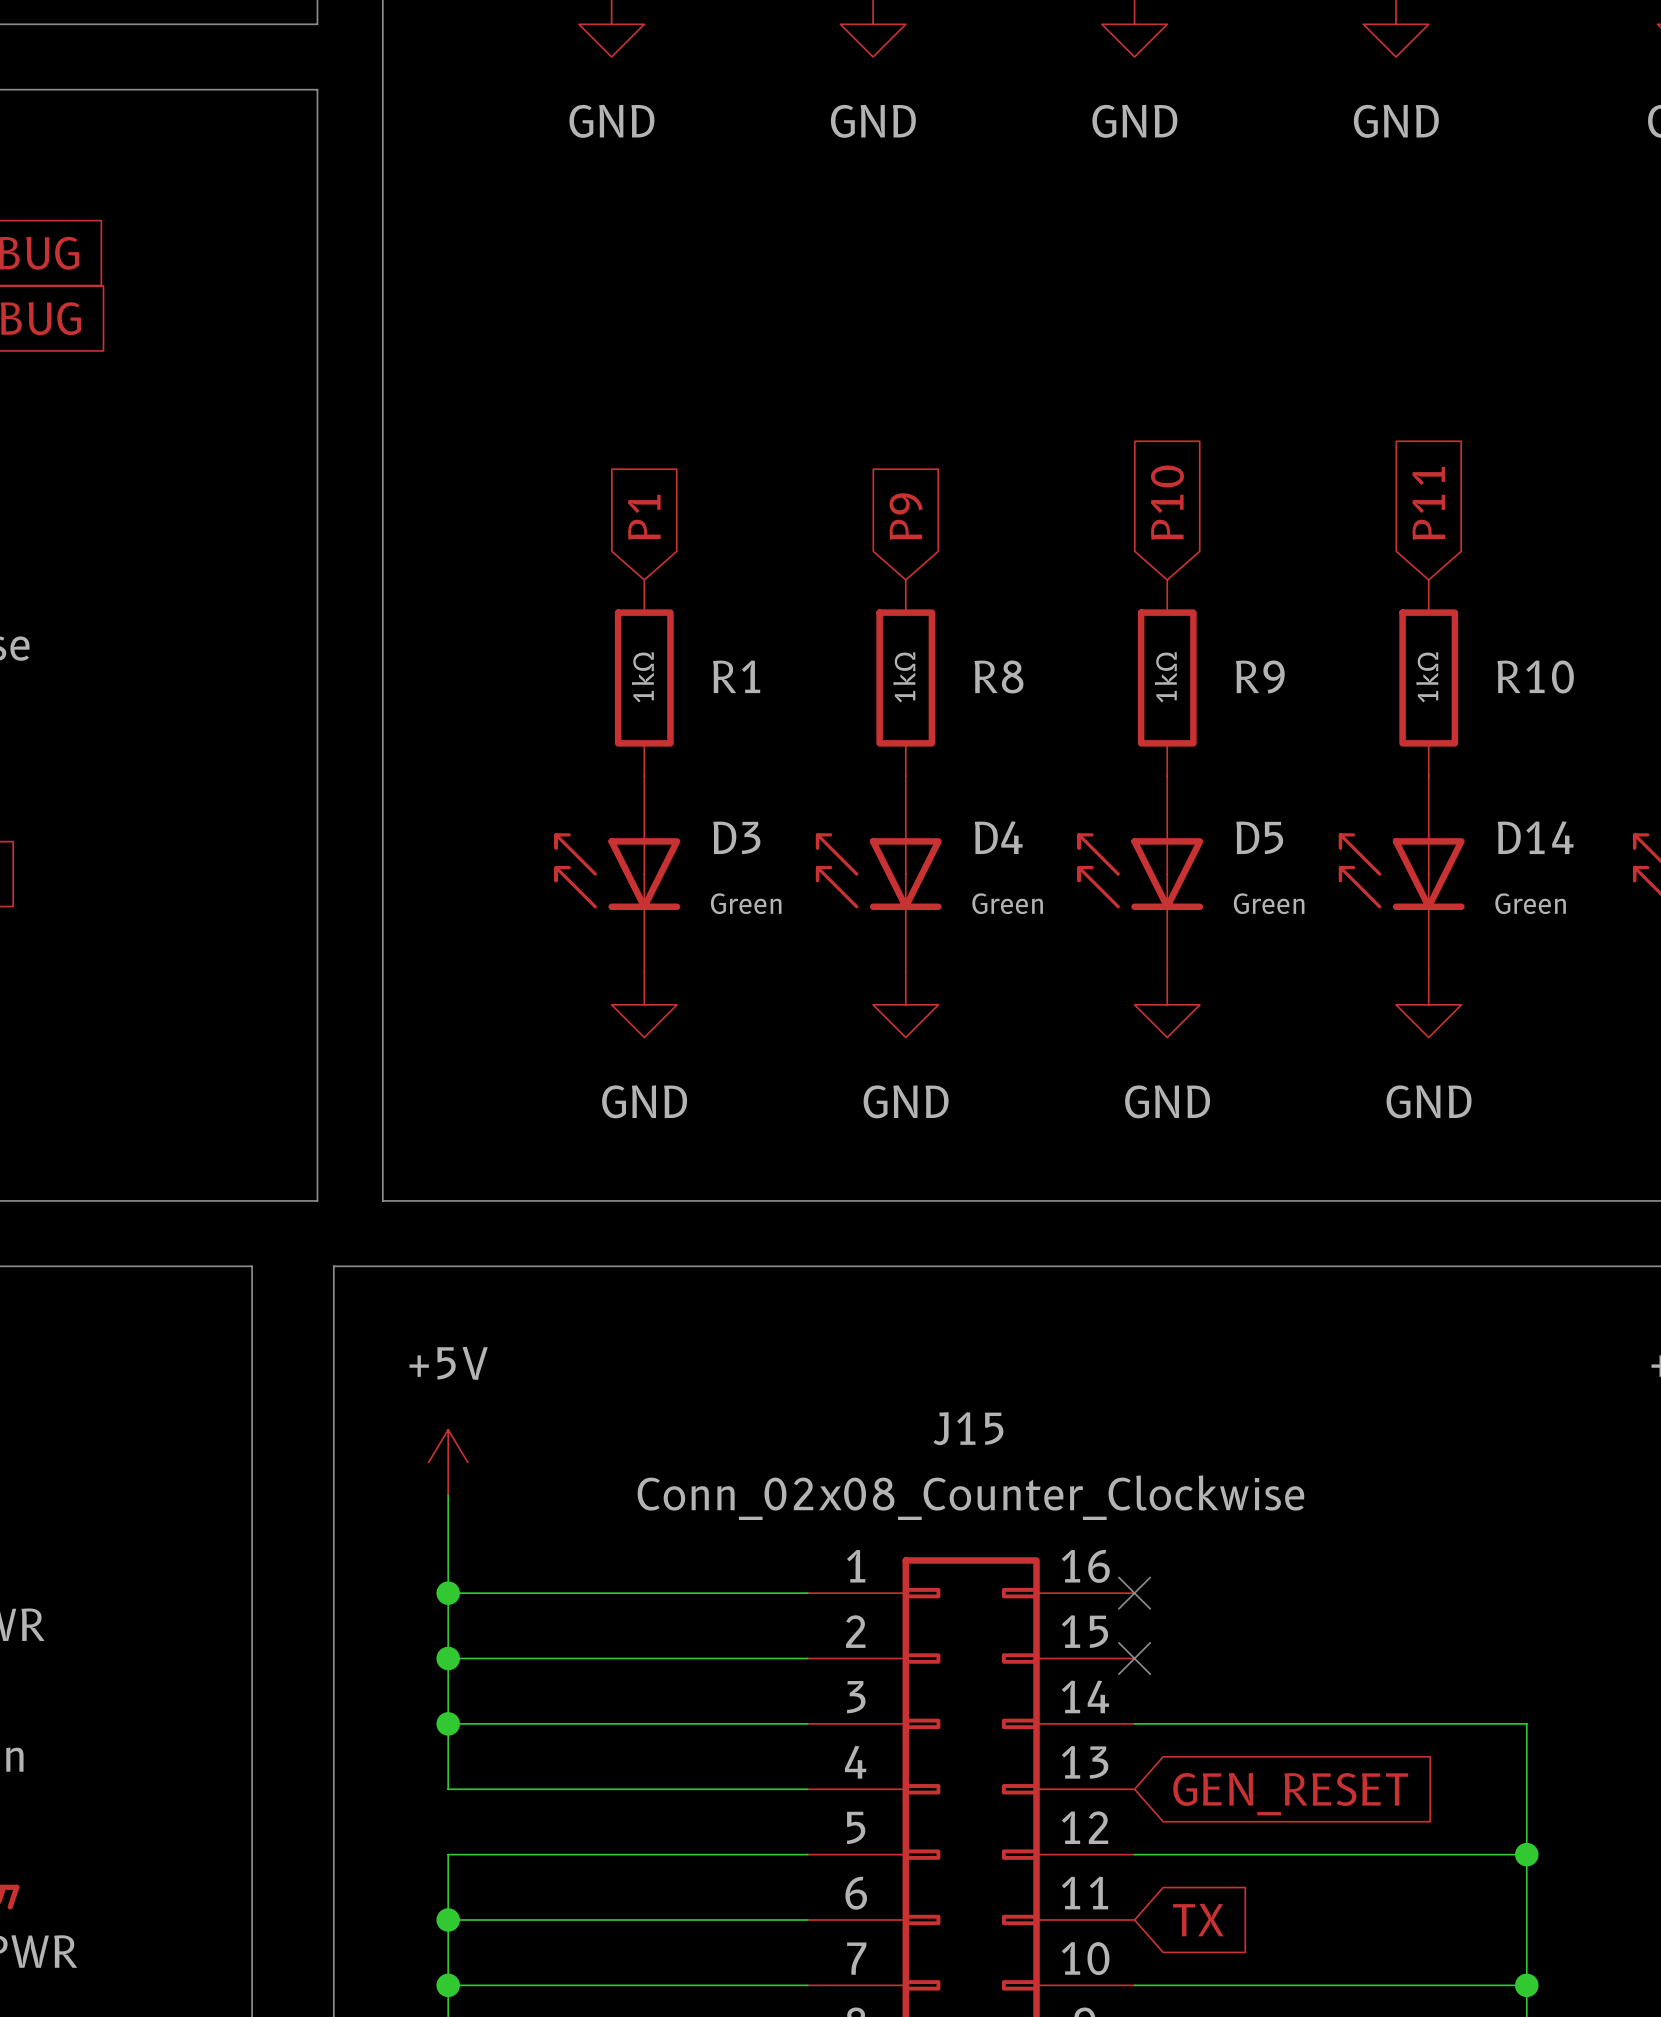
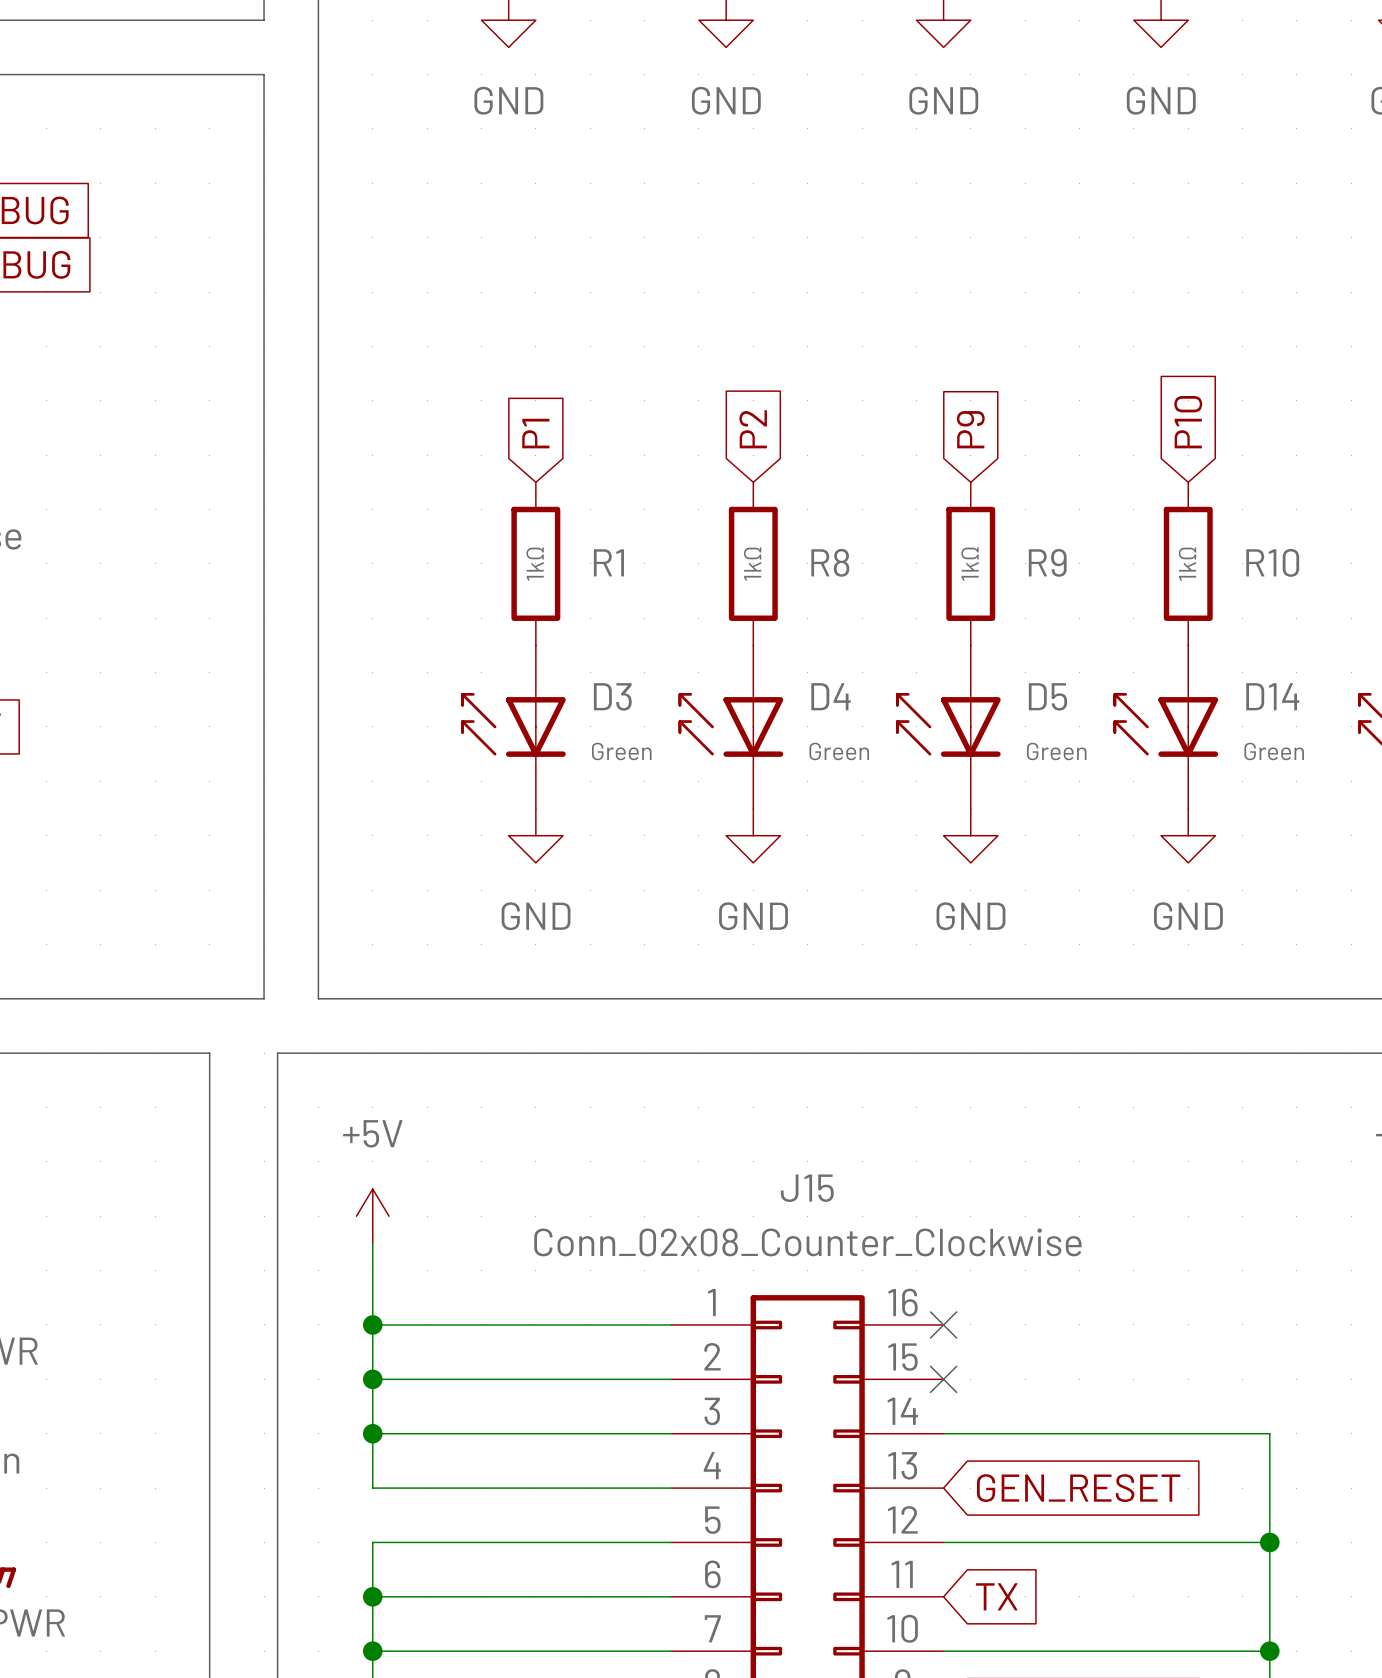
global label: P10 (1167, 502) -> P9 (970, 429)
global label: P11 (1428, 503) -> P10 (1188, 422)
global label: P9 (905, 516) -> P2 (753, 429)

